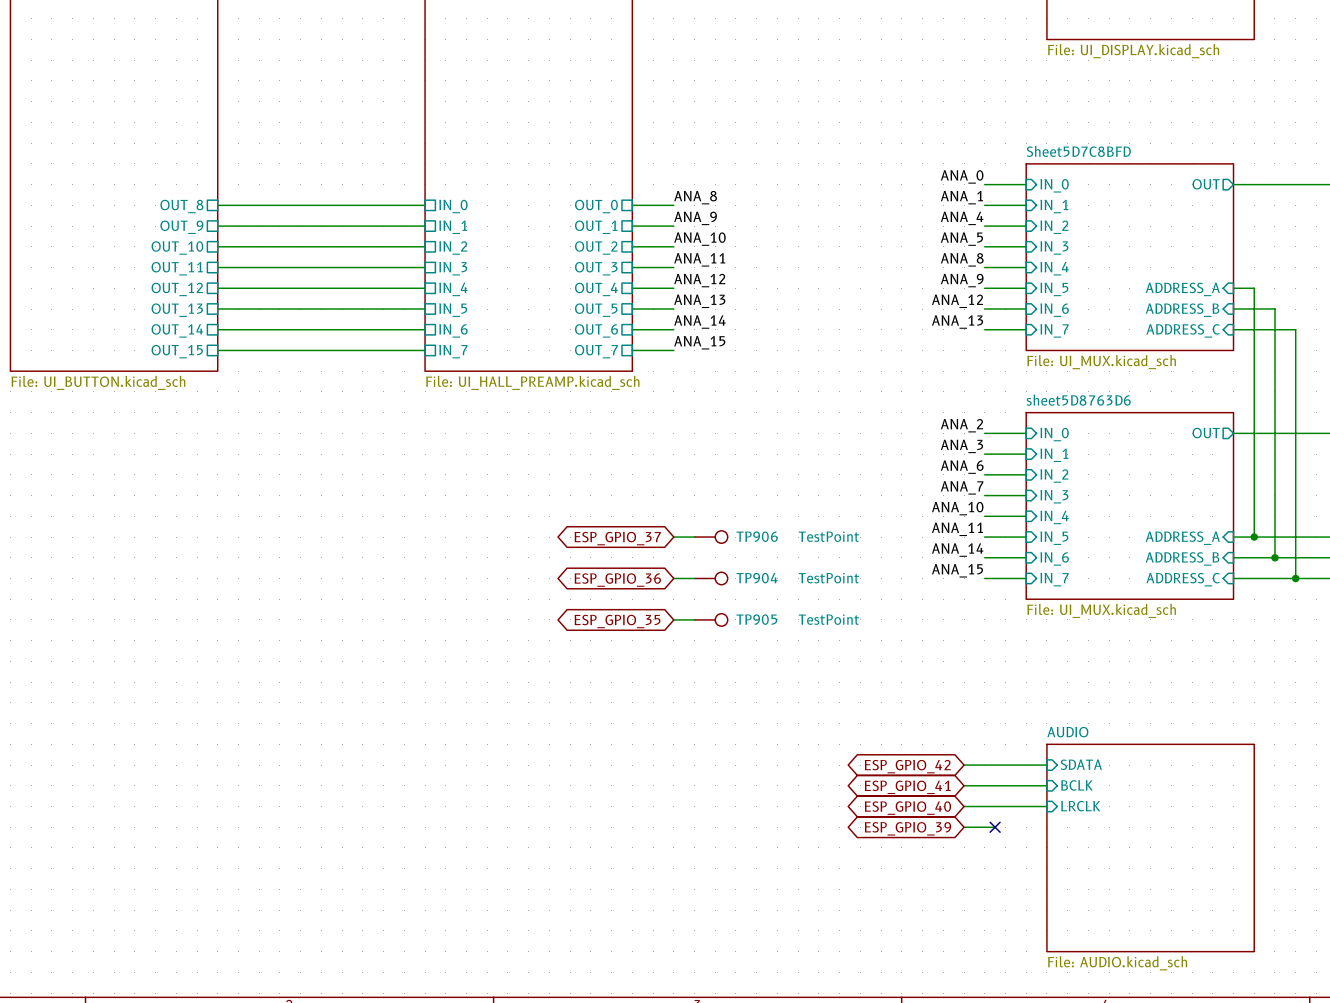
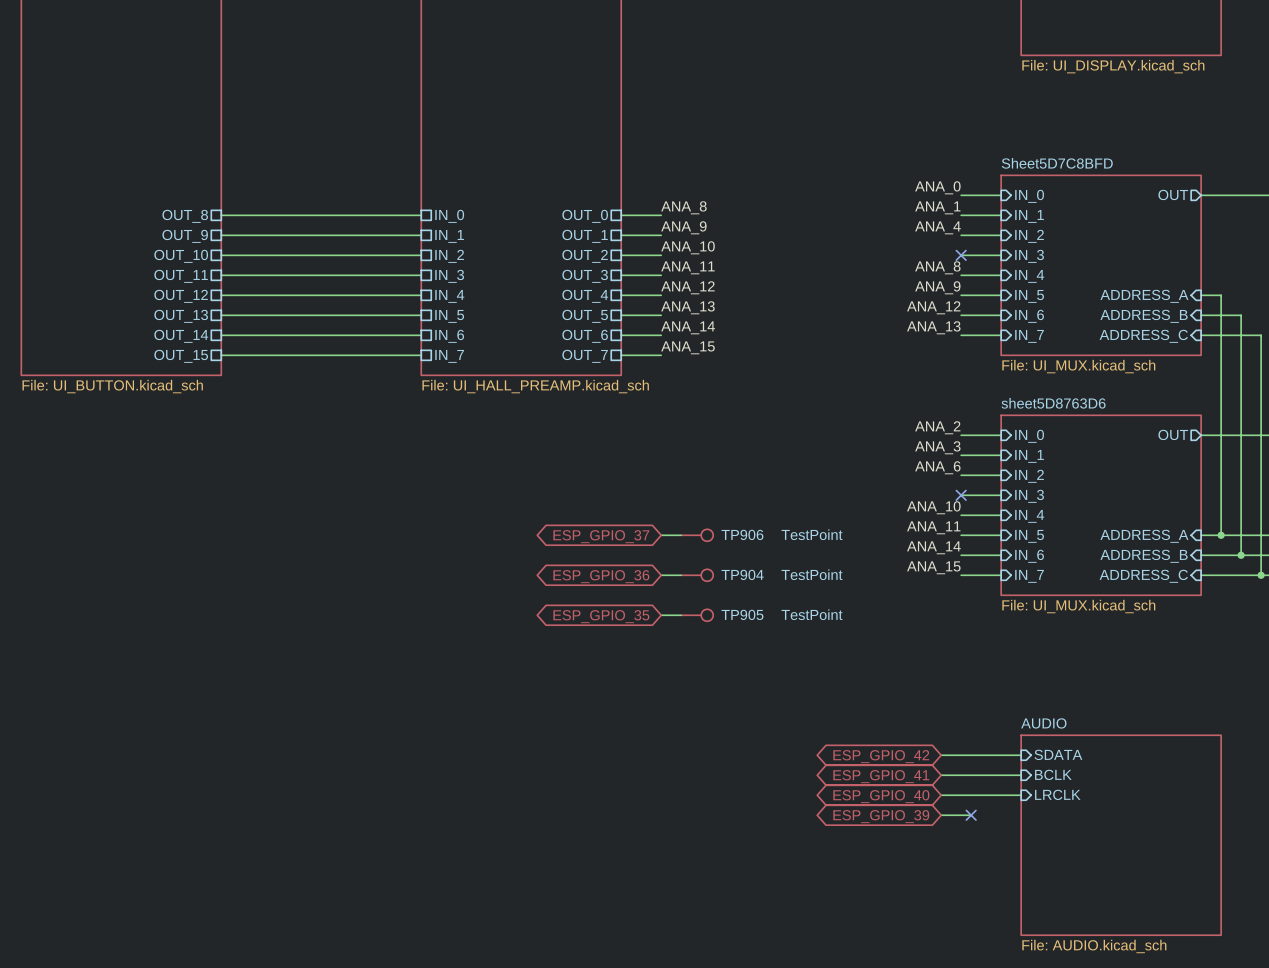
label: ANA_5 (961, 239) -> none
no-connect mark: none -> (961, 255)
label: ANA_7 (962, 487) -> none
no-connect mark: none -> (961, 495)

